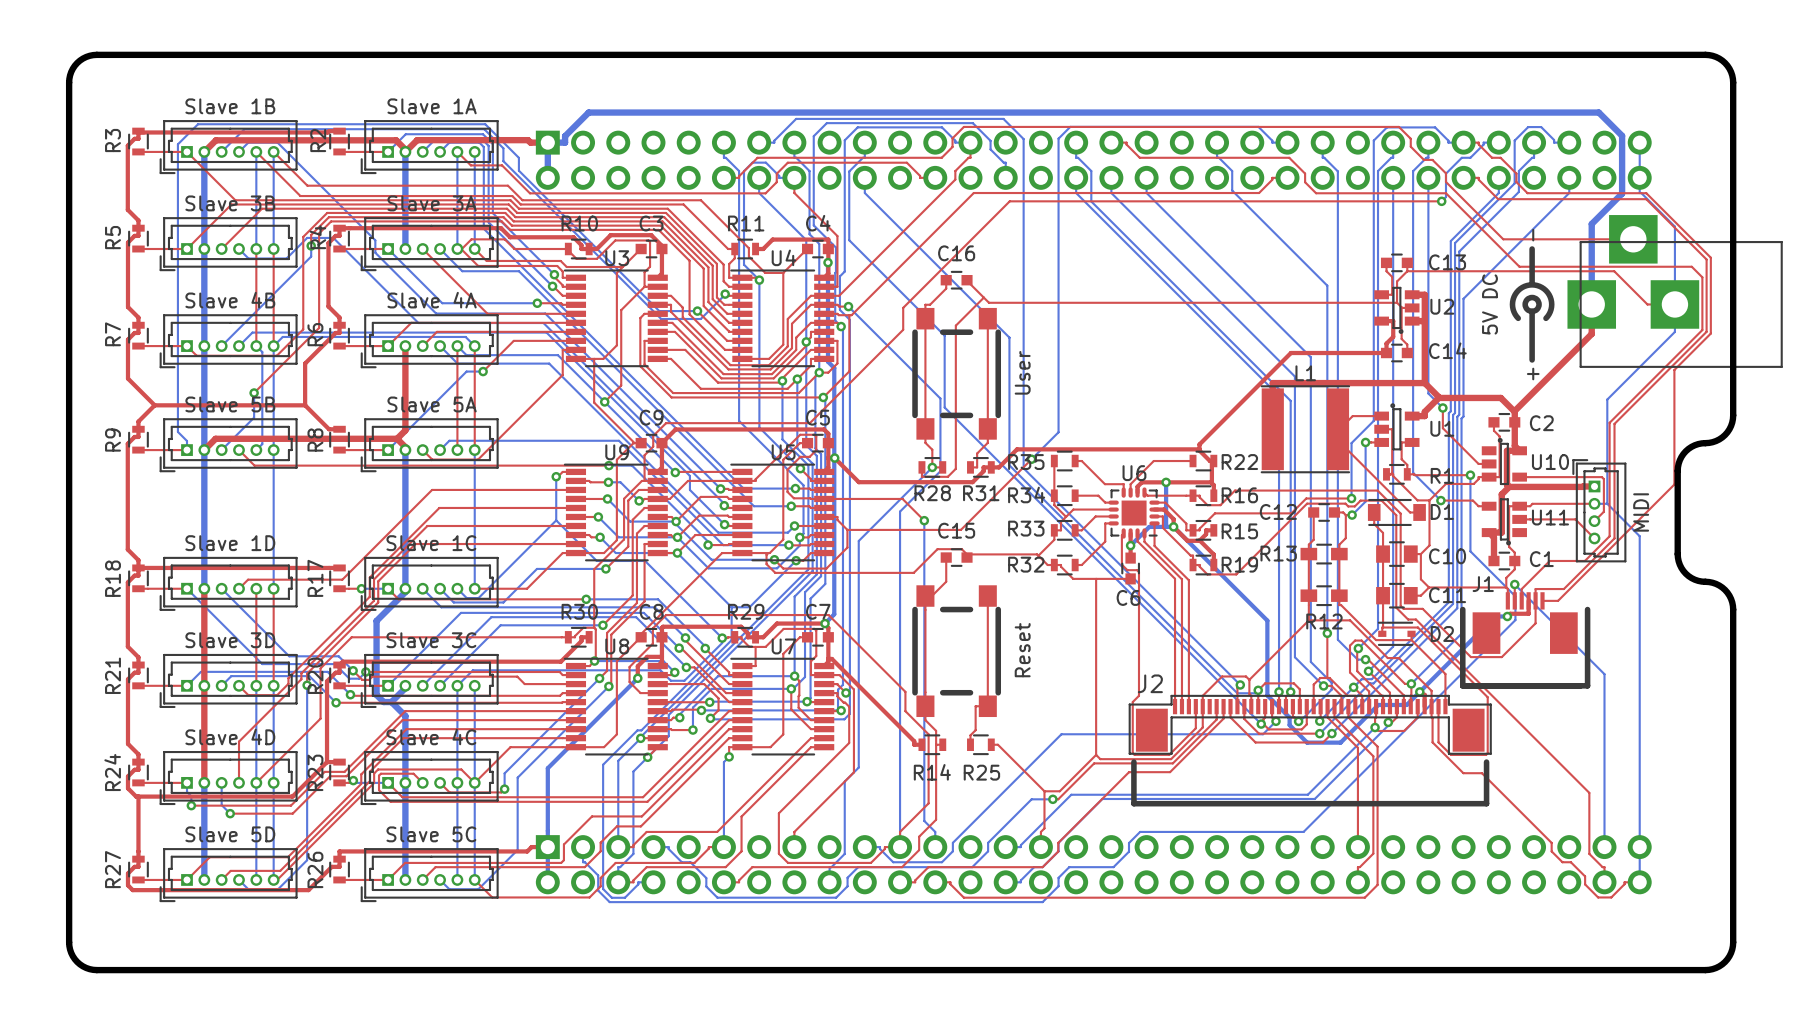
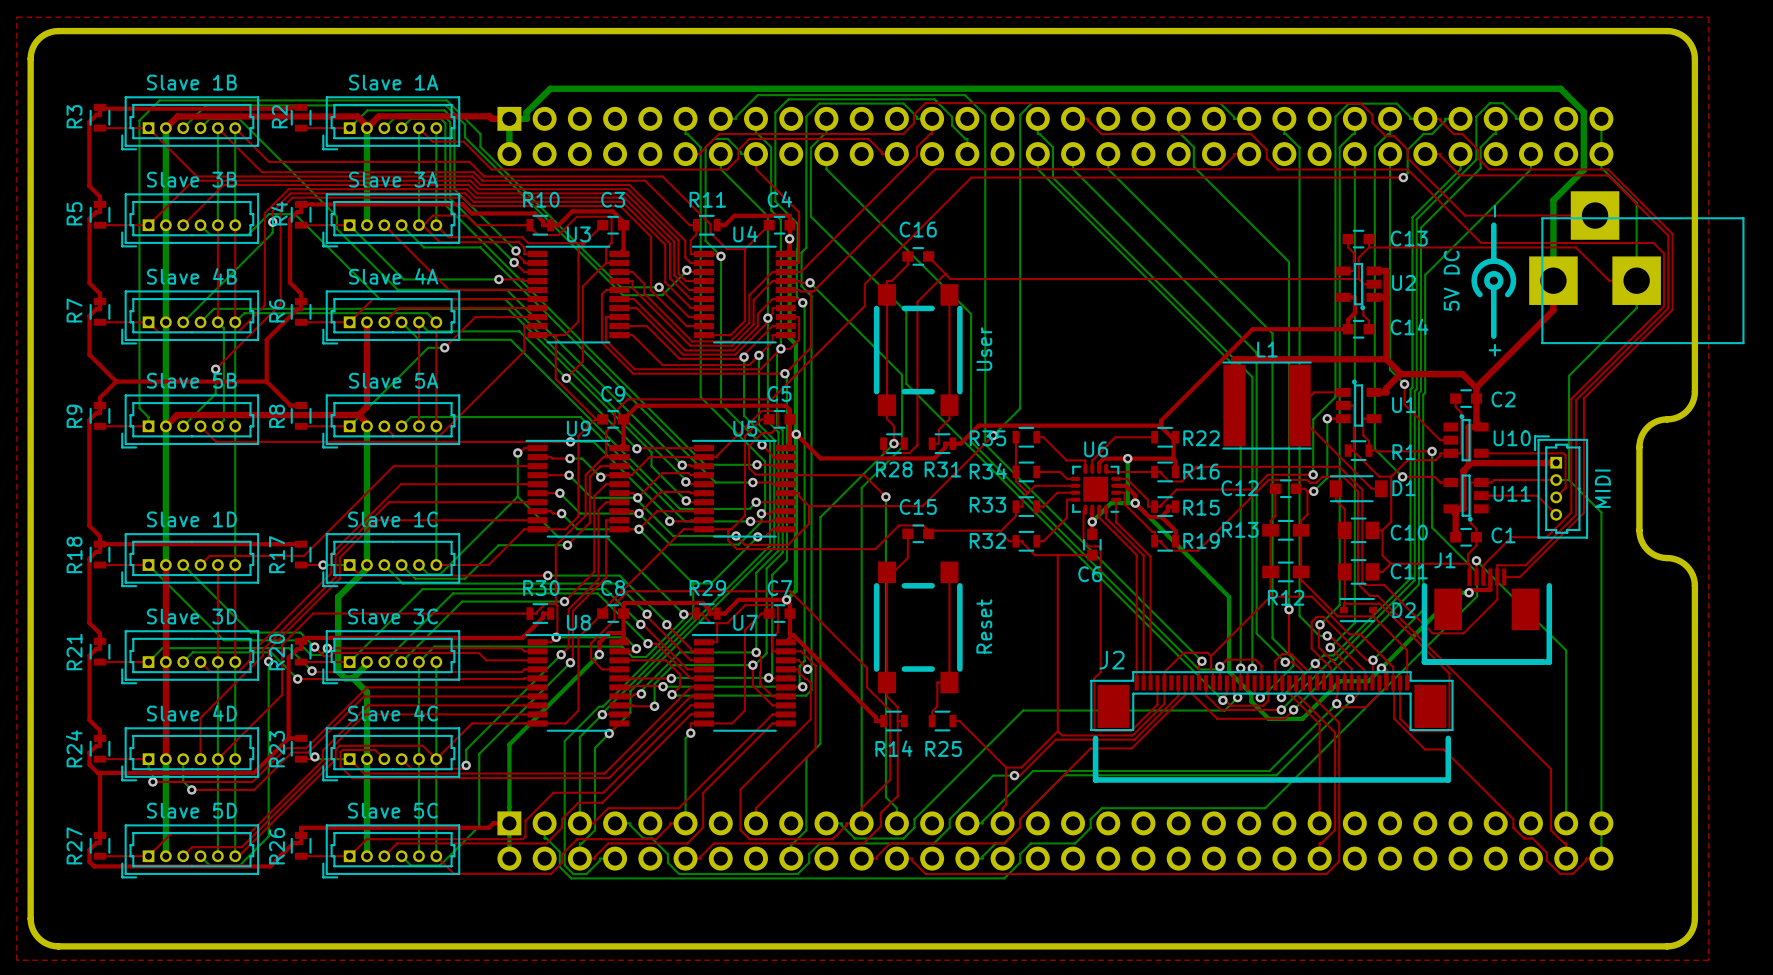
top zone outline: none -> (16, 17) (1708, 17) (1708, 960) (16, 960) (16, 17)
top track: (1674, 369) (1674, 484) (1622, 536) -> (1636, 346) (1583, 398) (1583, 512)

